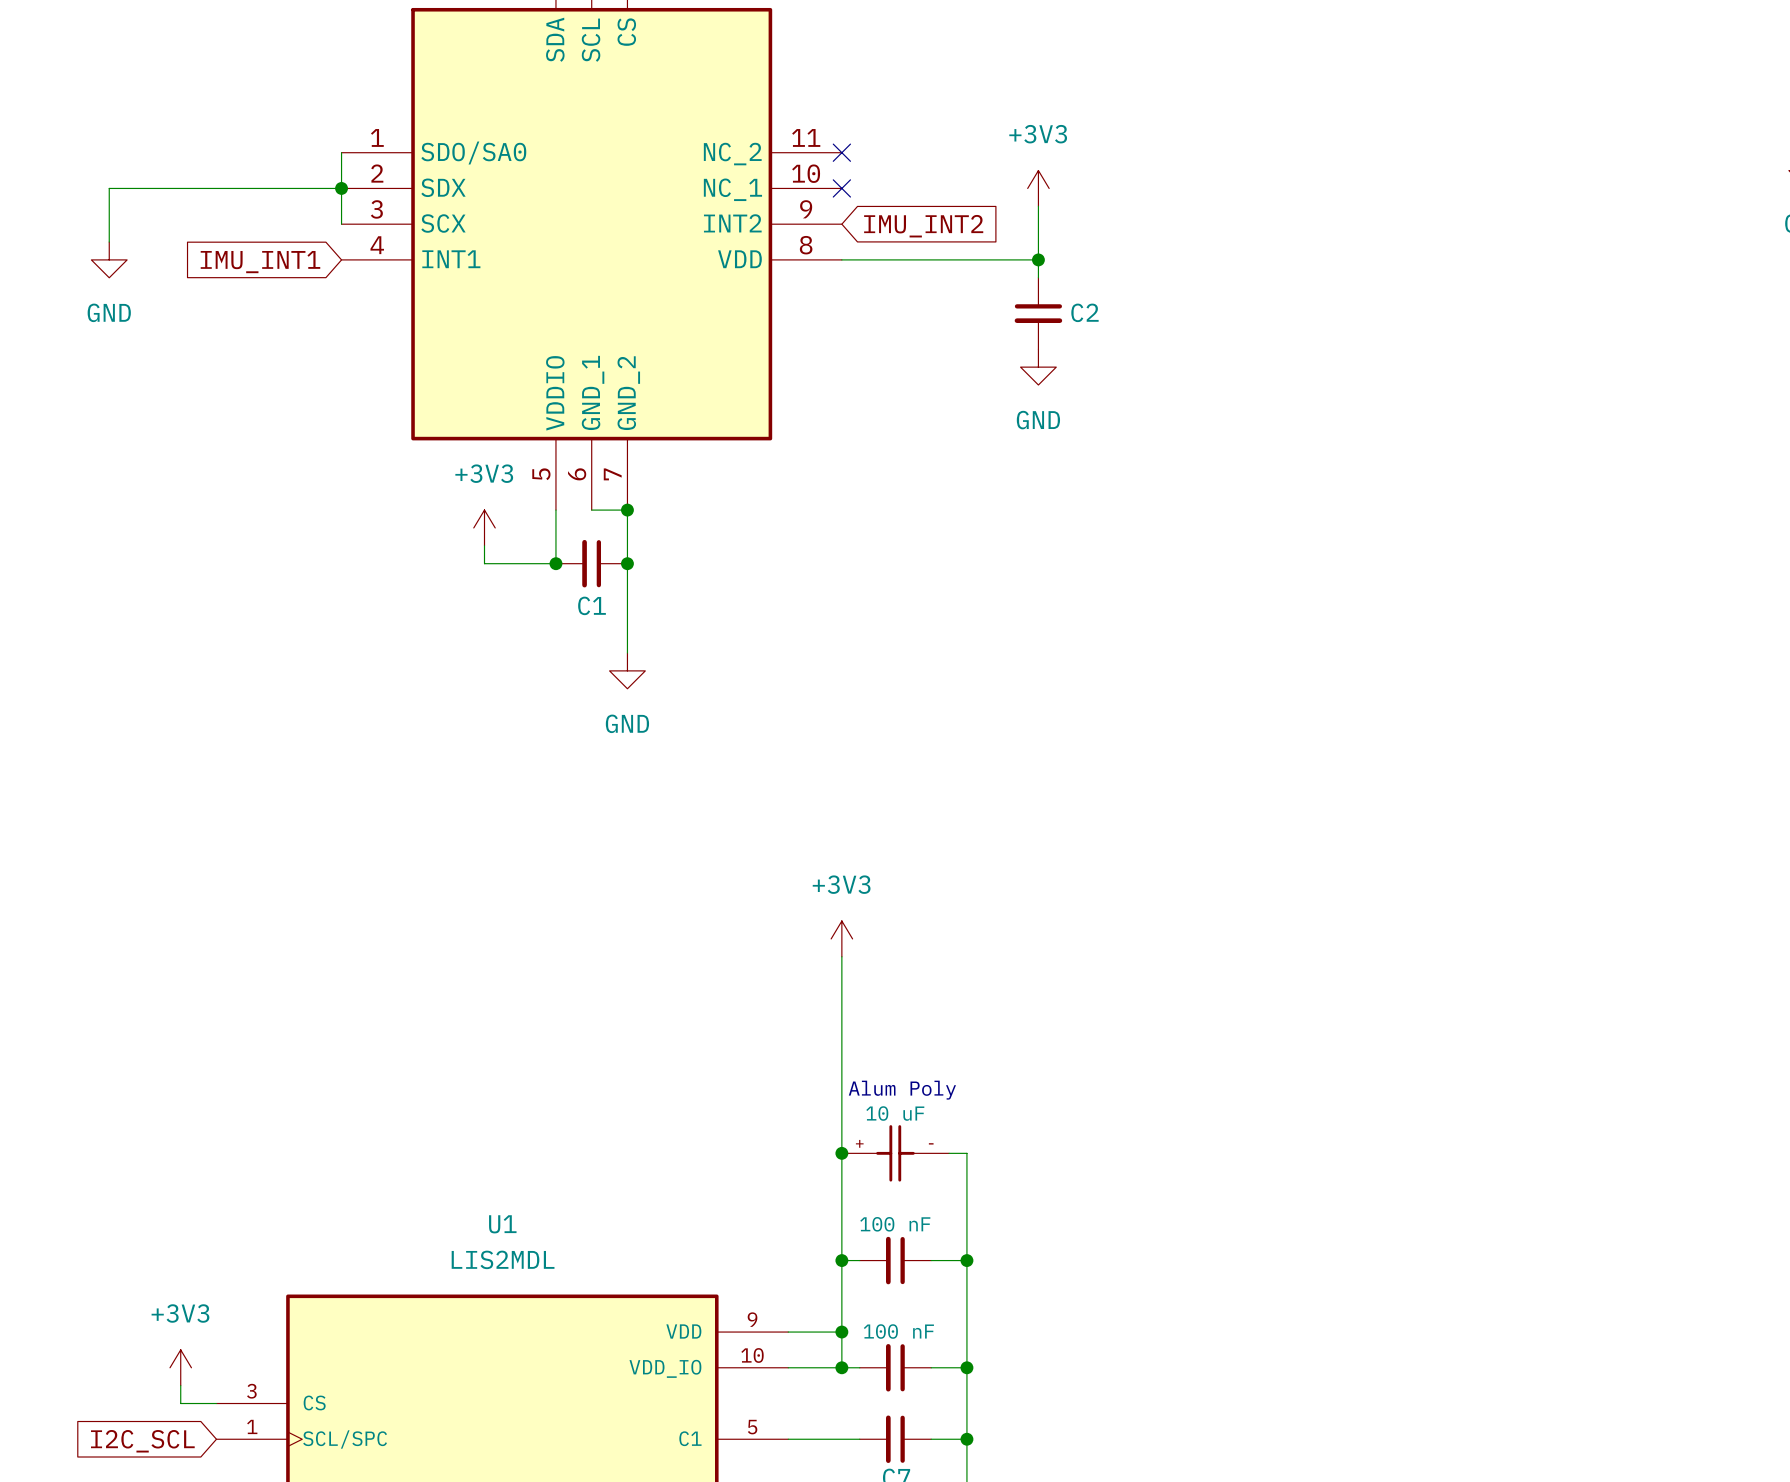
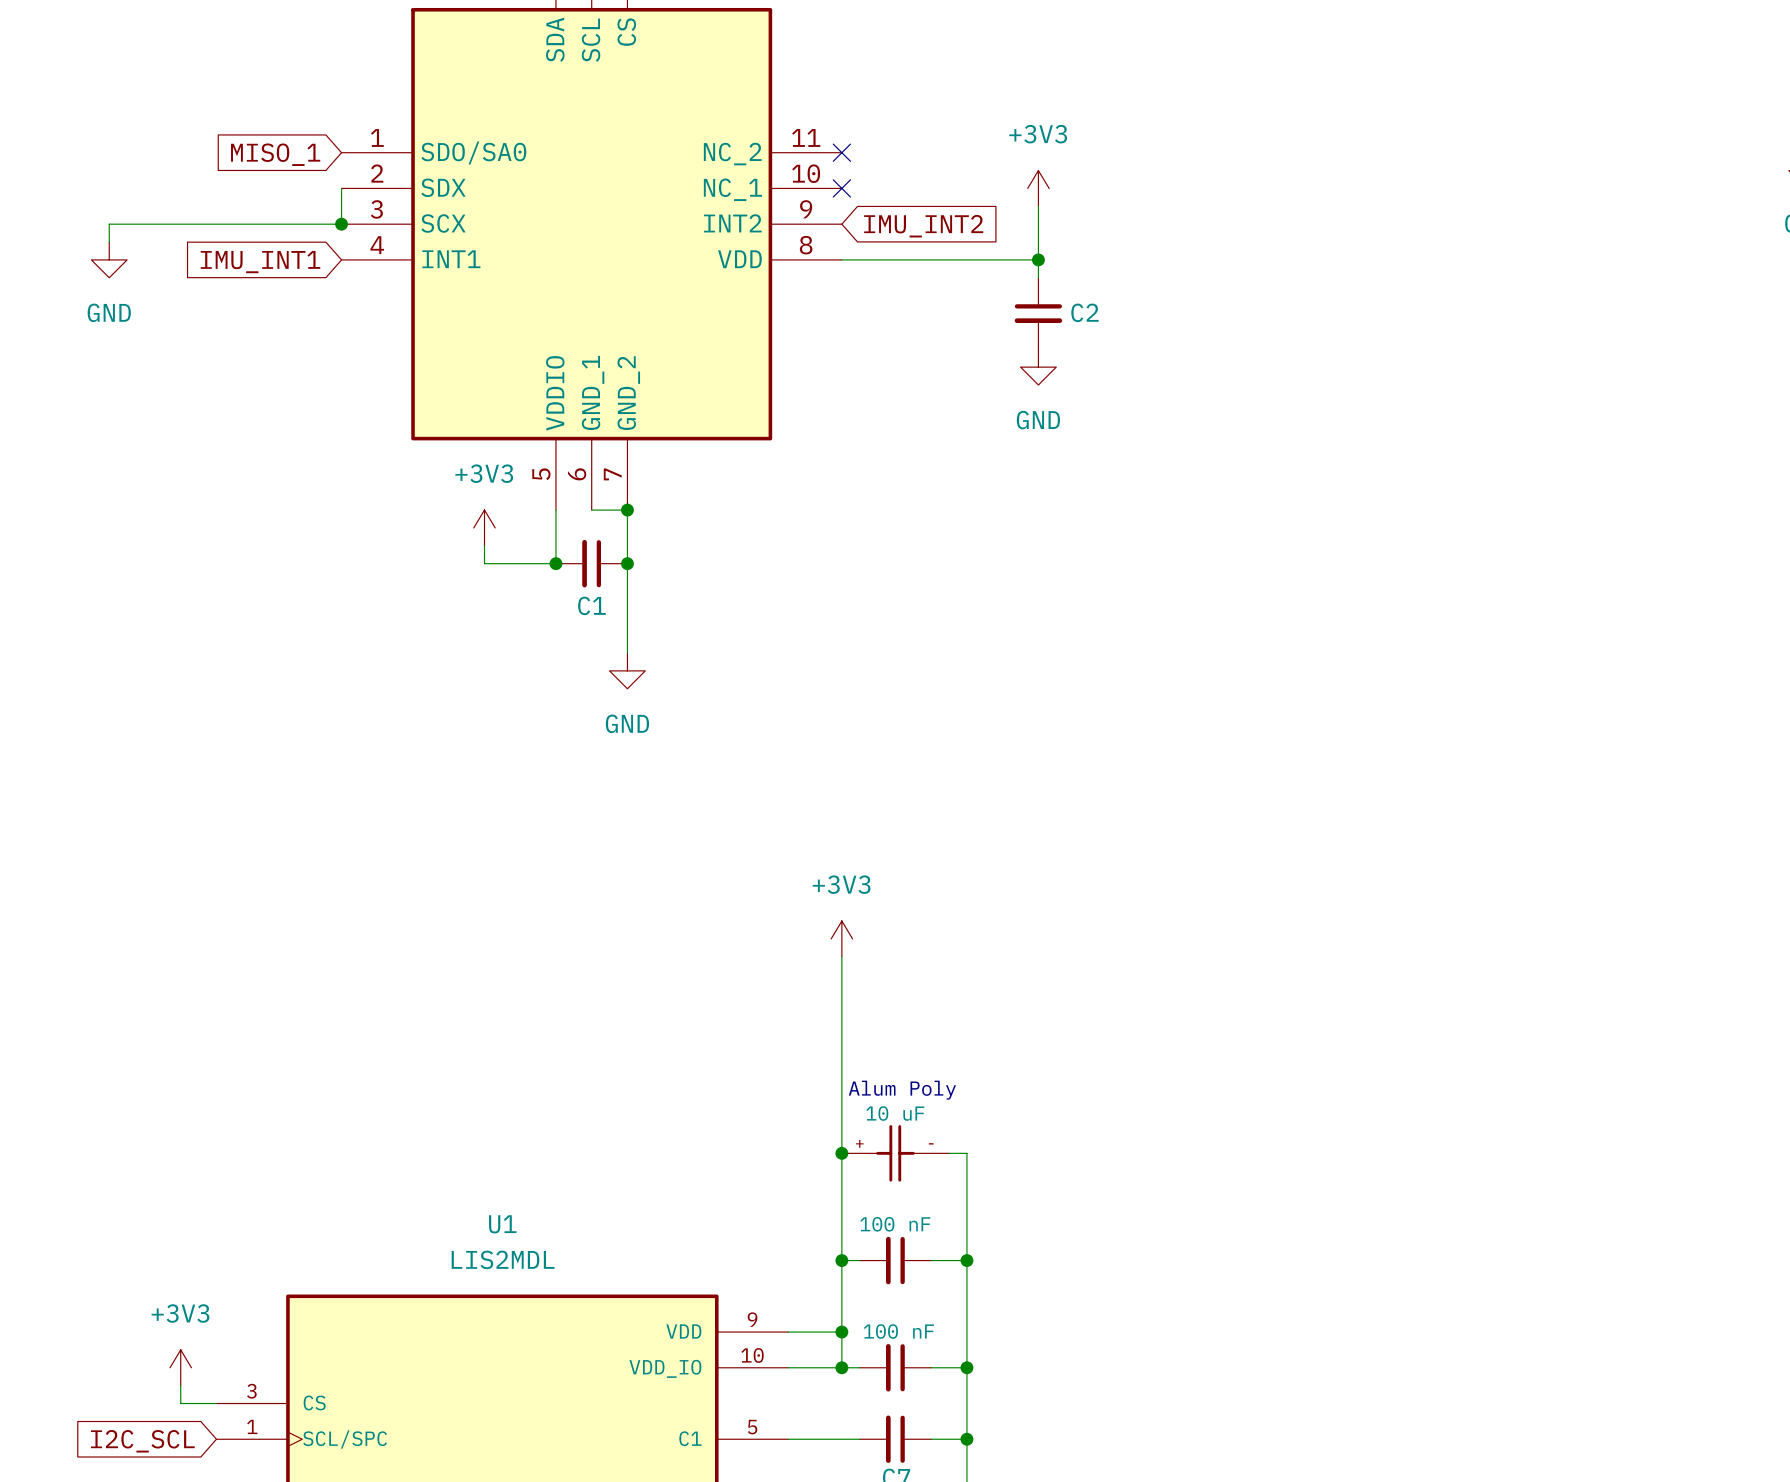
wire: (341, 152) (341, 188) (109, 188) (109, 224) -> (341, 224) (109, 224)
global label: none -> MISO_1 (275, 154)
junction position: (341, 188) -> (341, 224)

